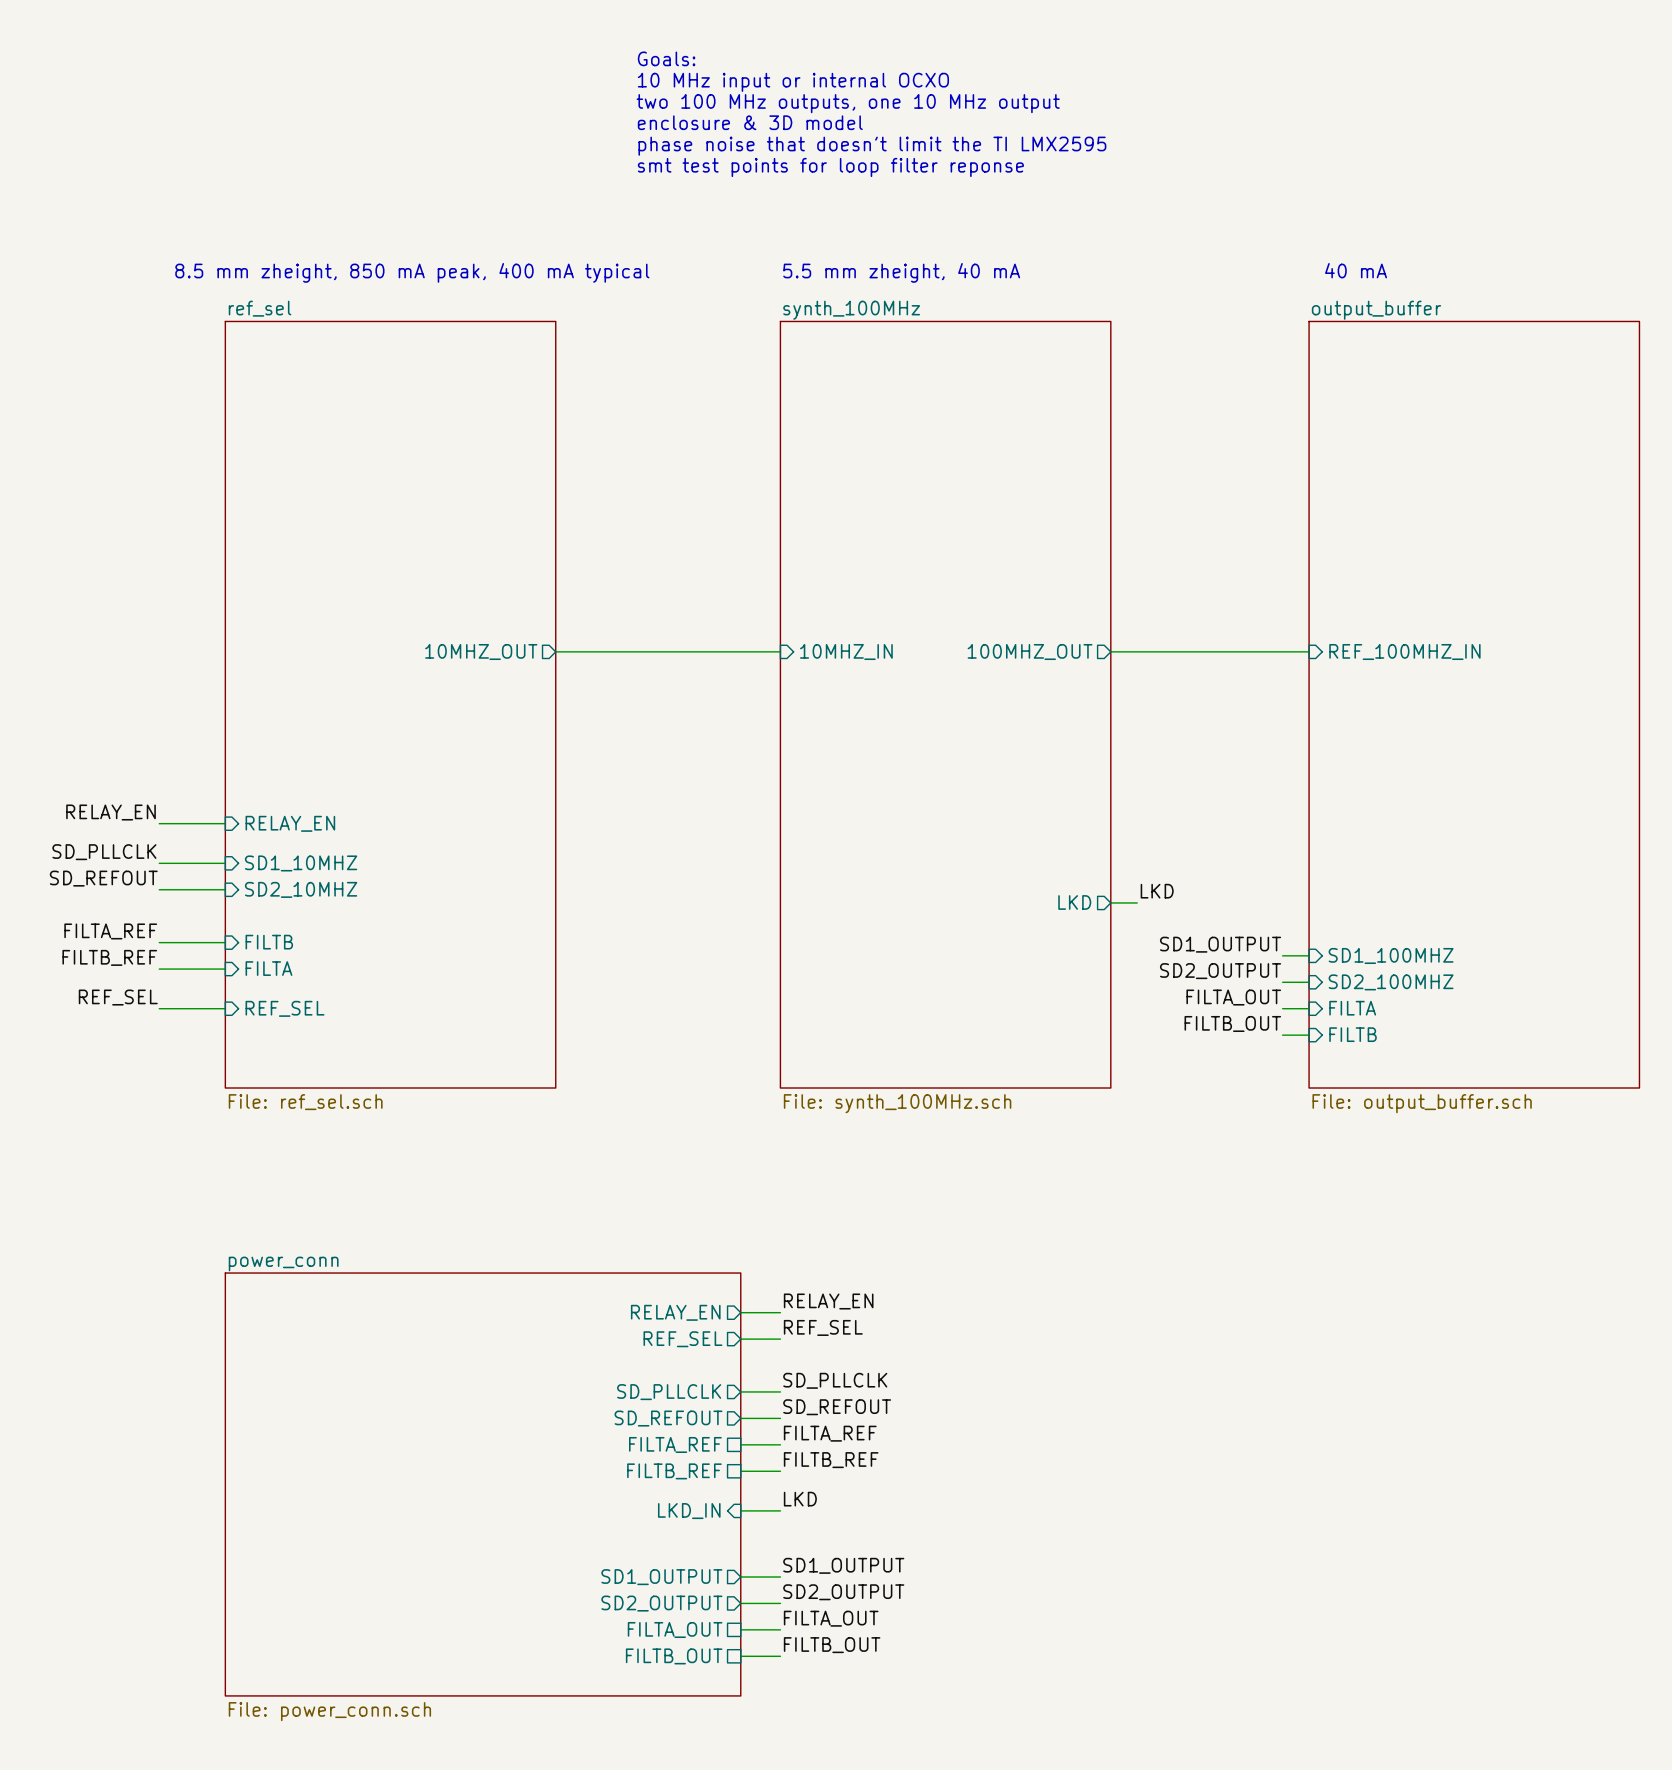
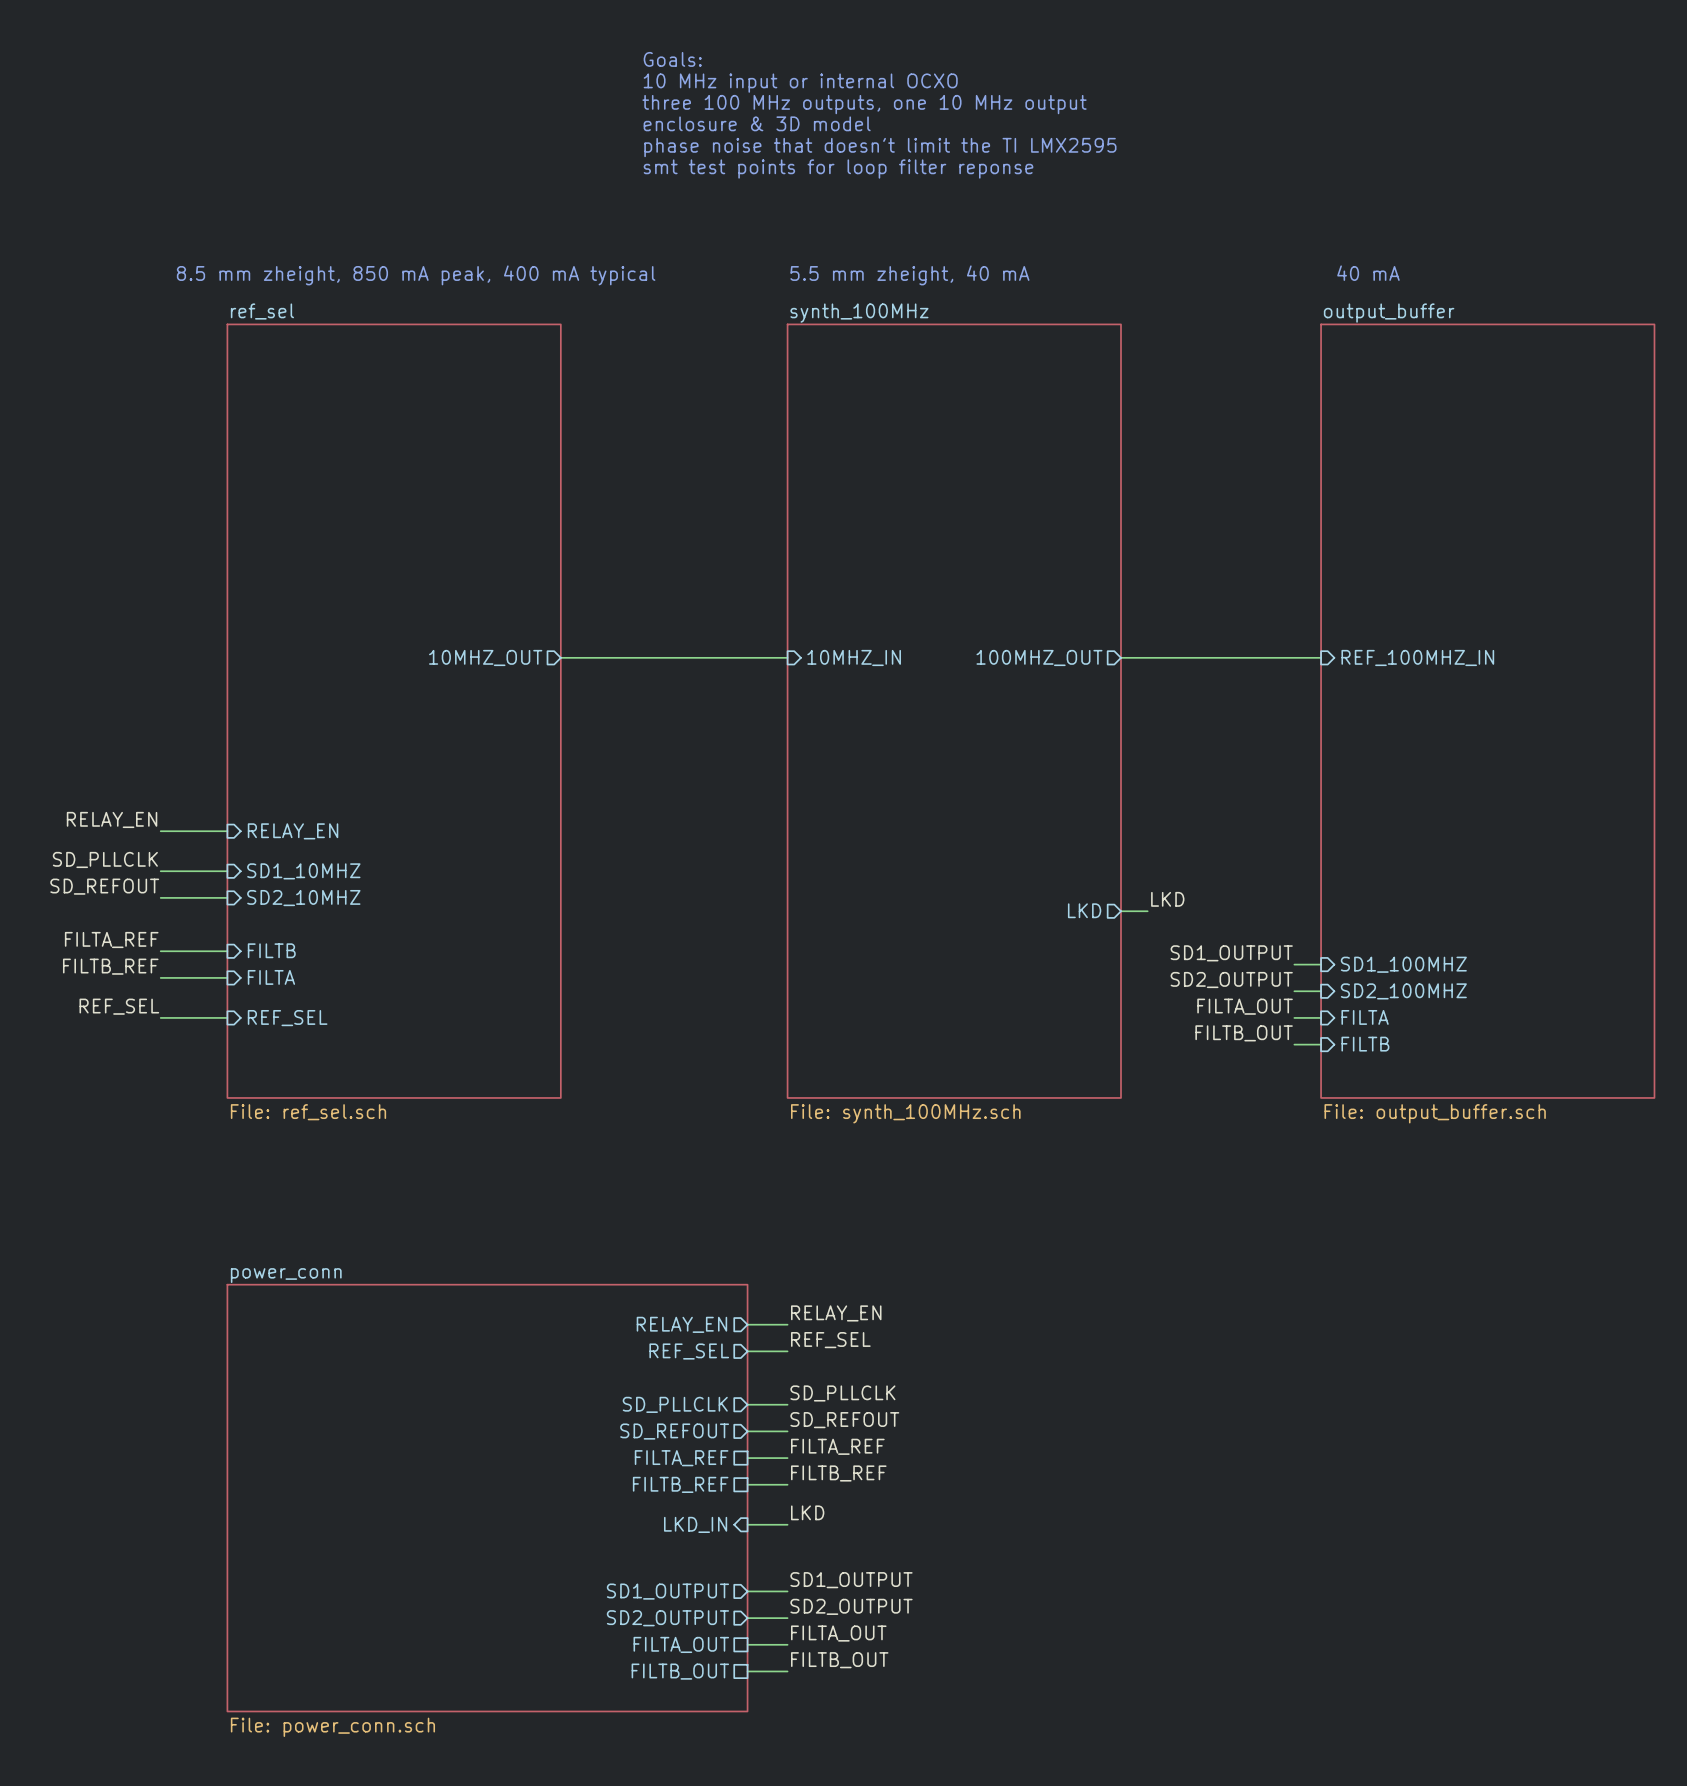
text: two 100 MHz outputs, one 10 MHz output (848, 103) -> three 100 MHz outputs, one 10 MHz output (864, 104)

